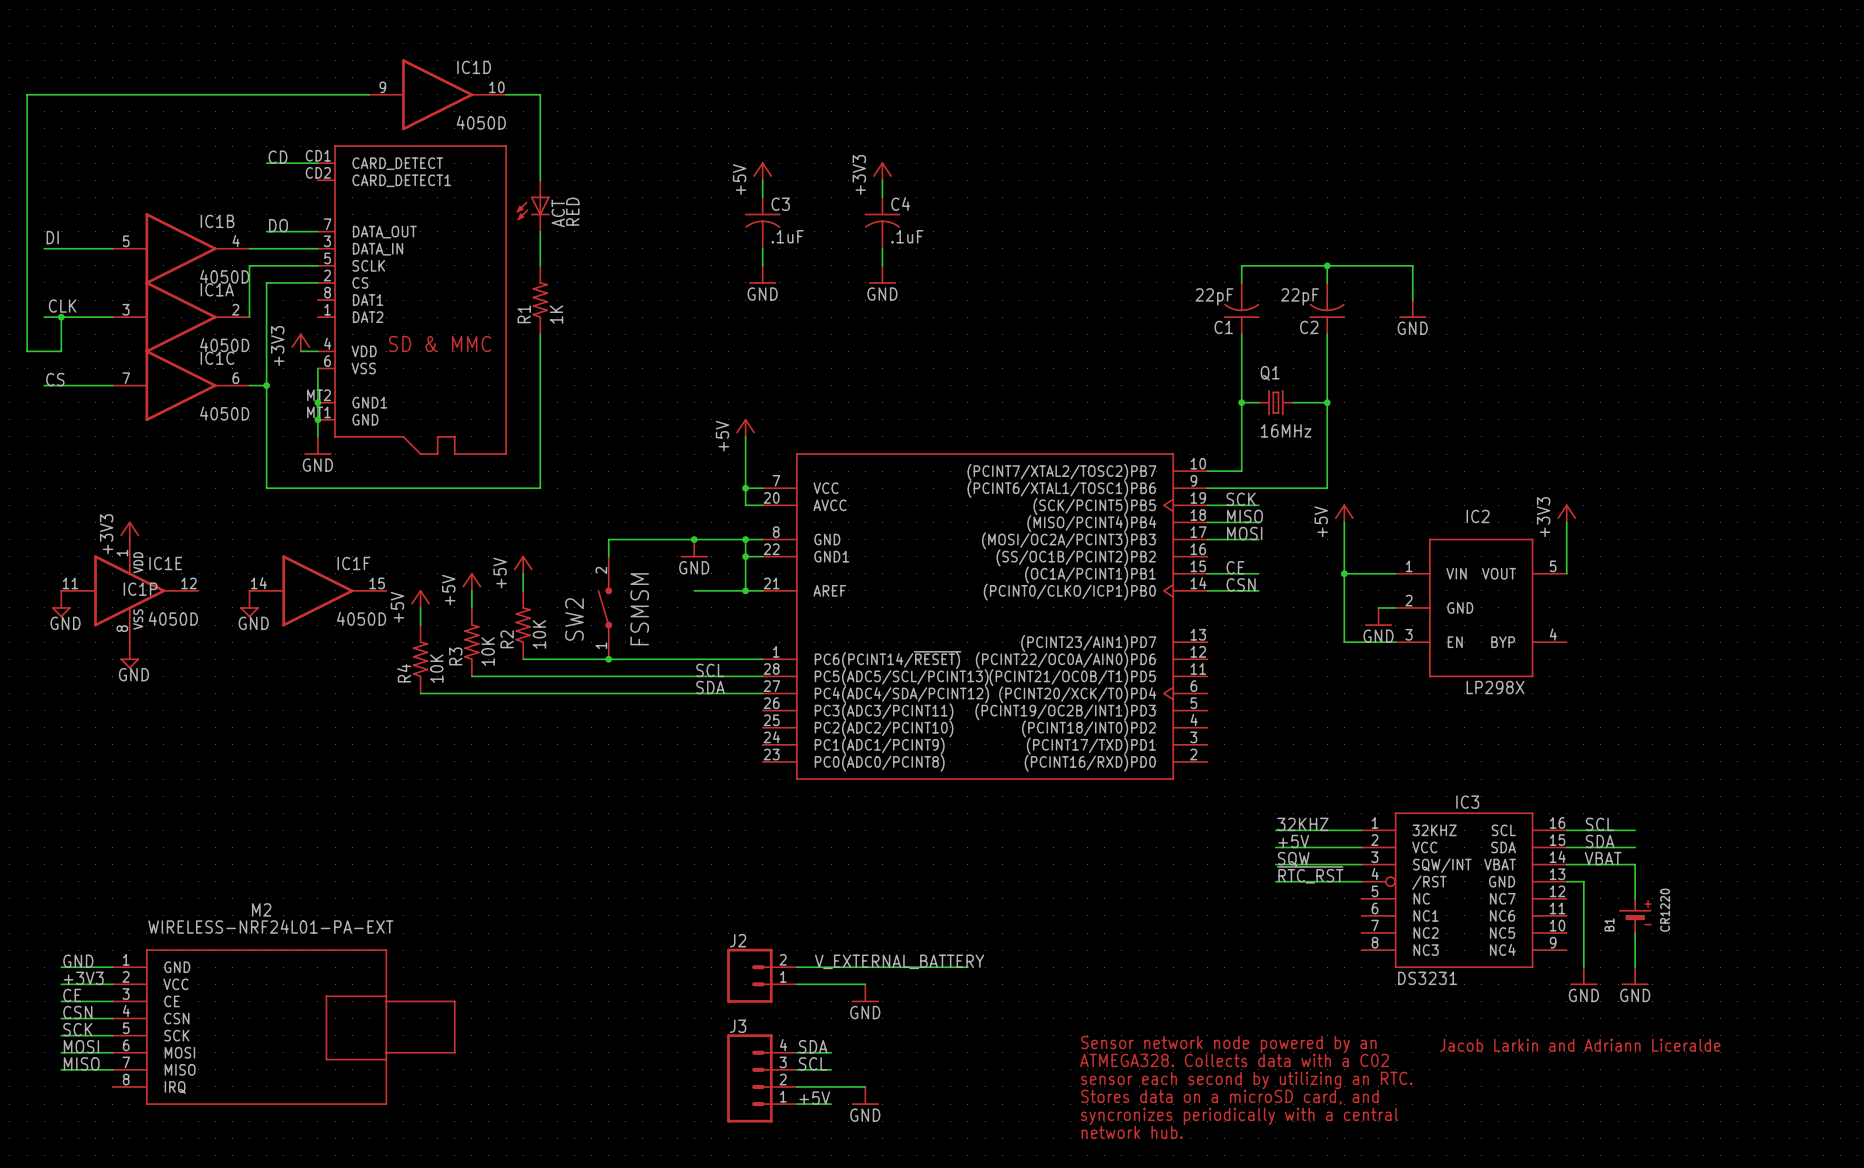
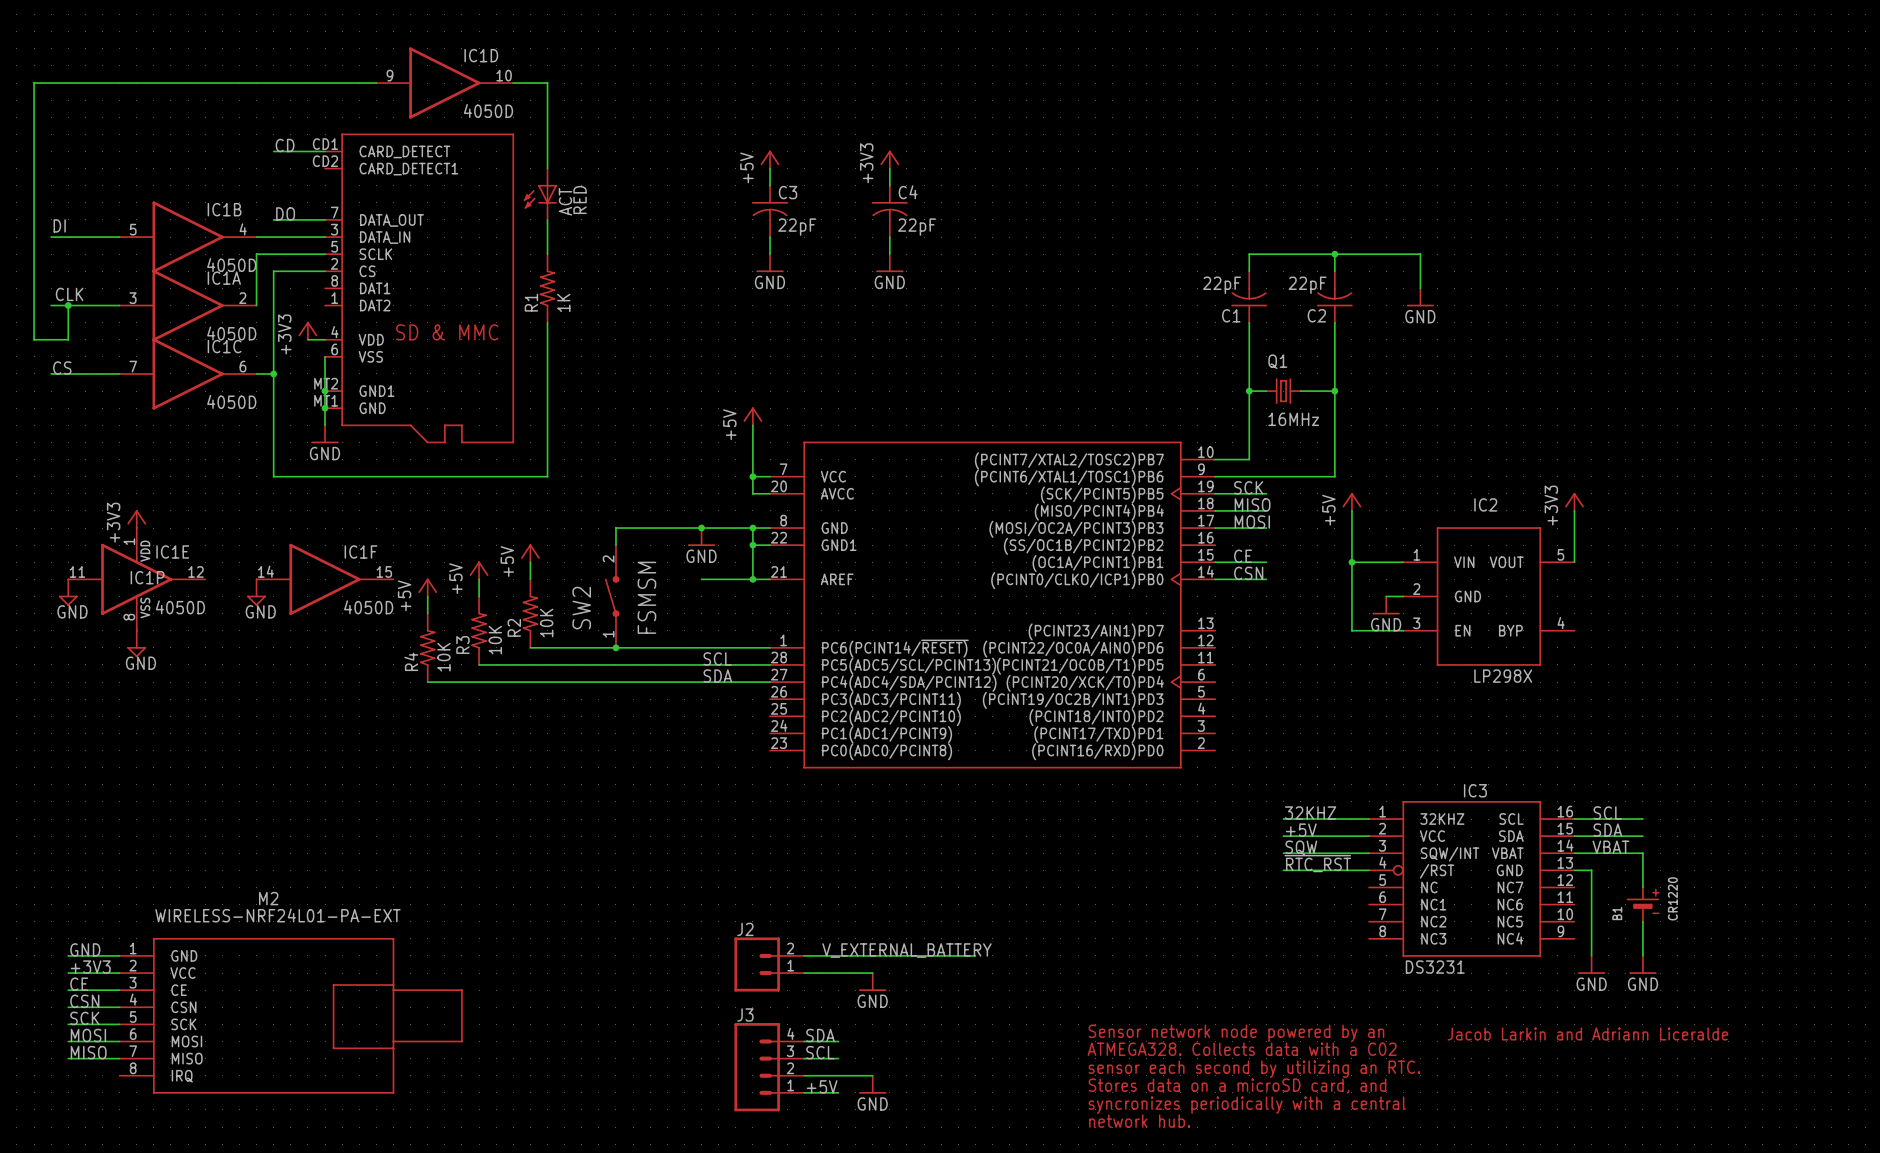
C3 value: .1uF (787, 236) -> 22pF (797, 227)
C4 value: .1uF (907, 236) -> 22pF (917, 227)

